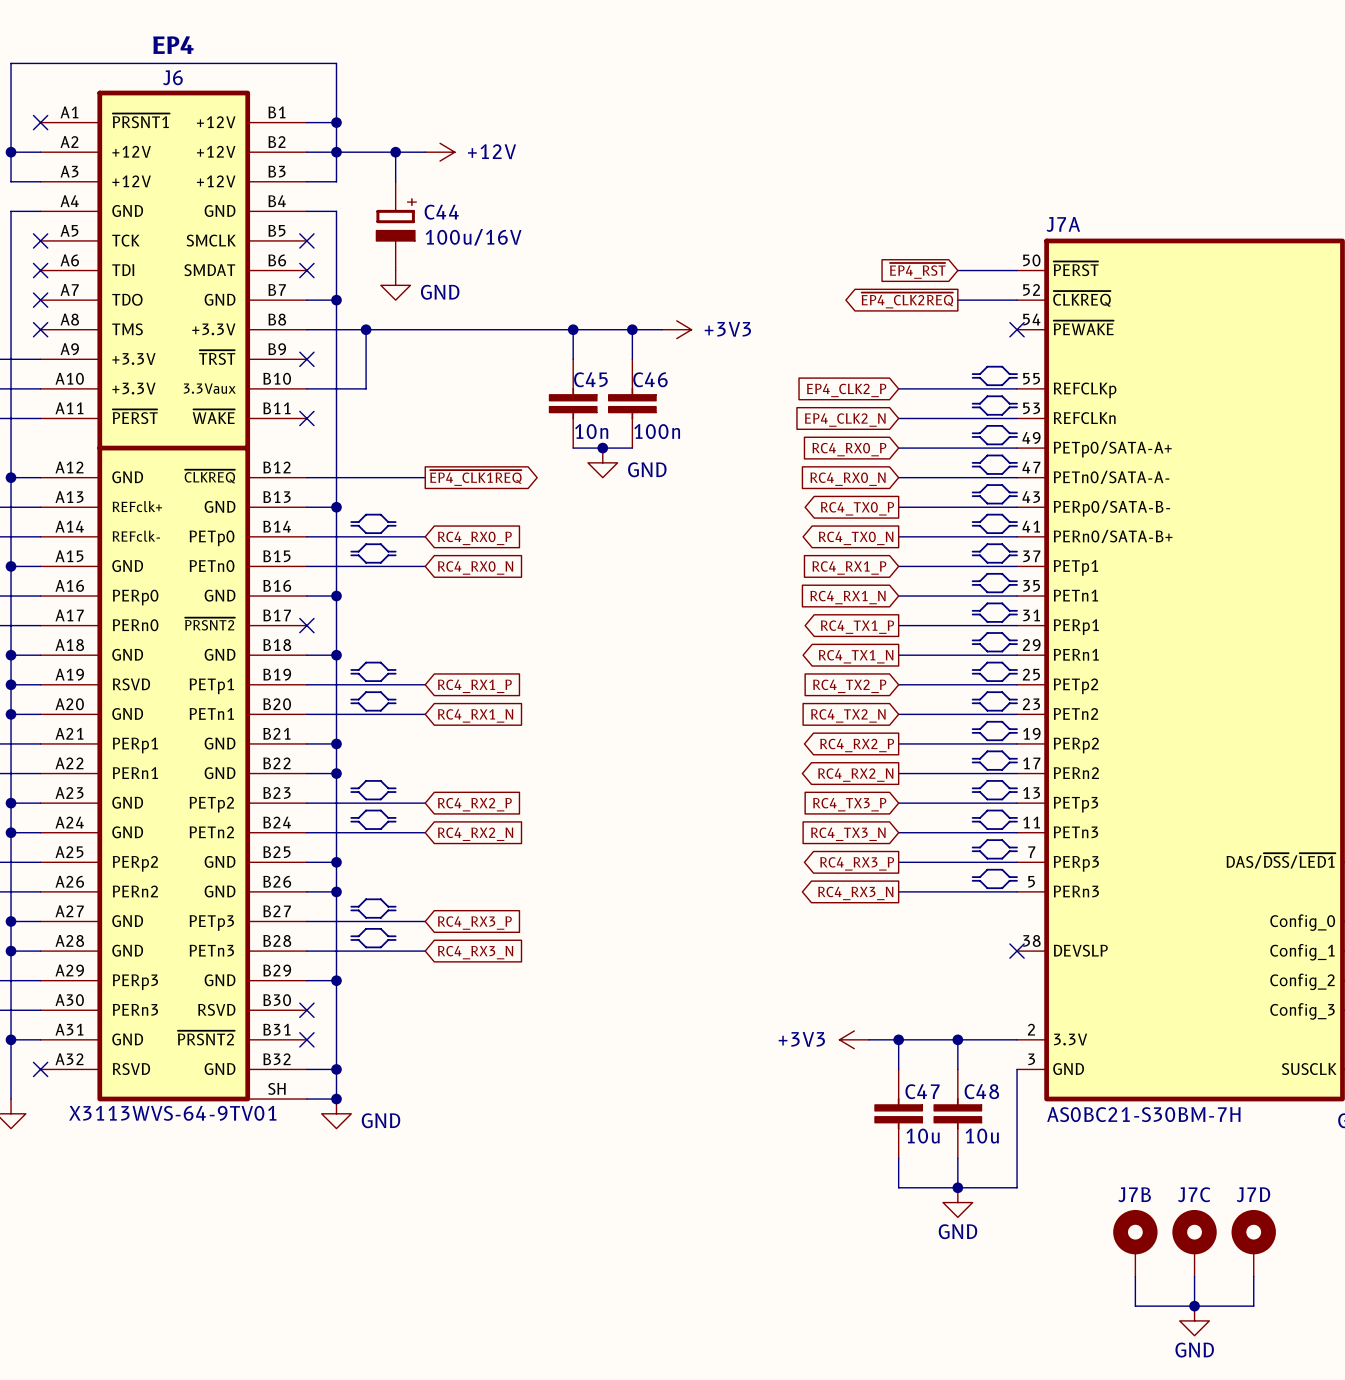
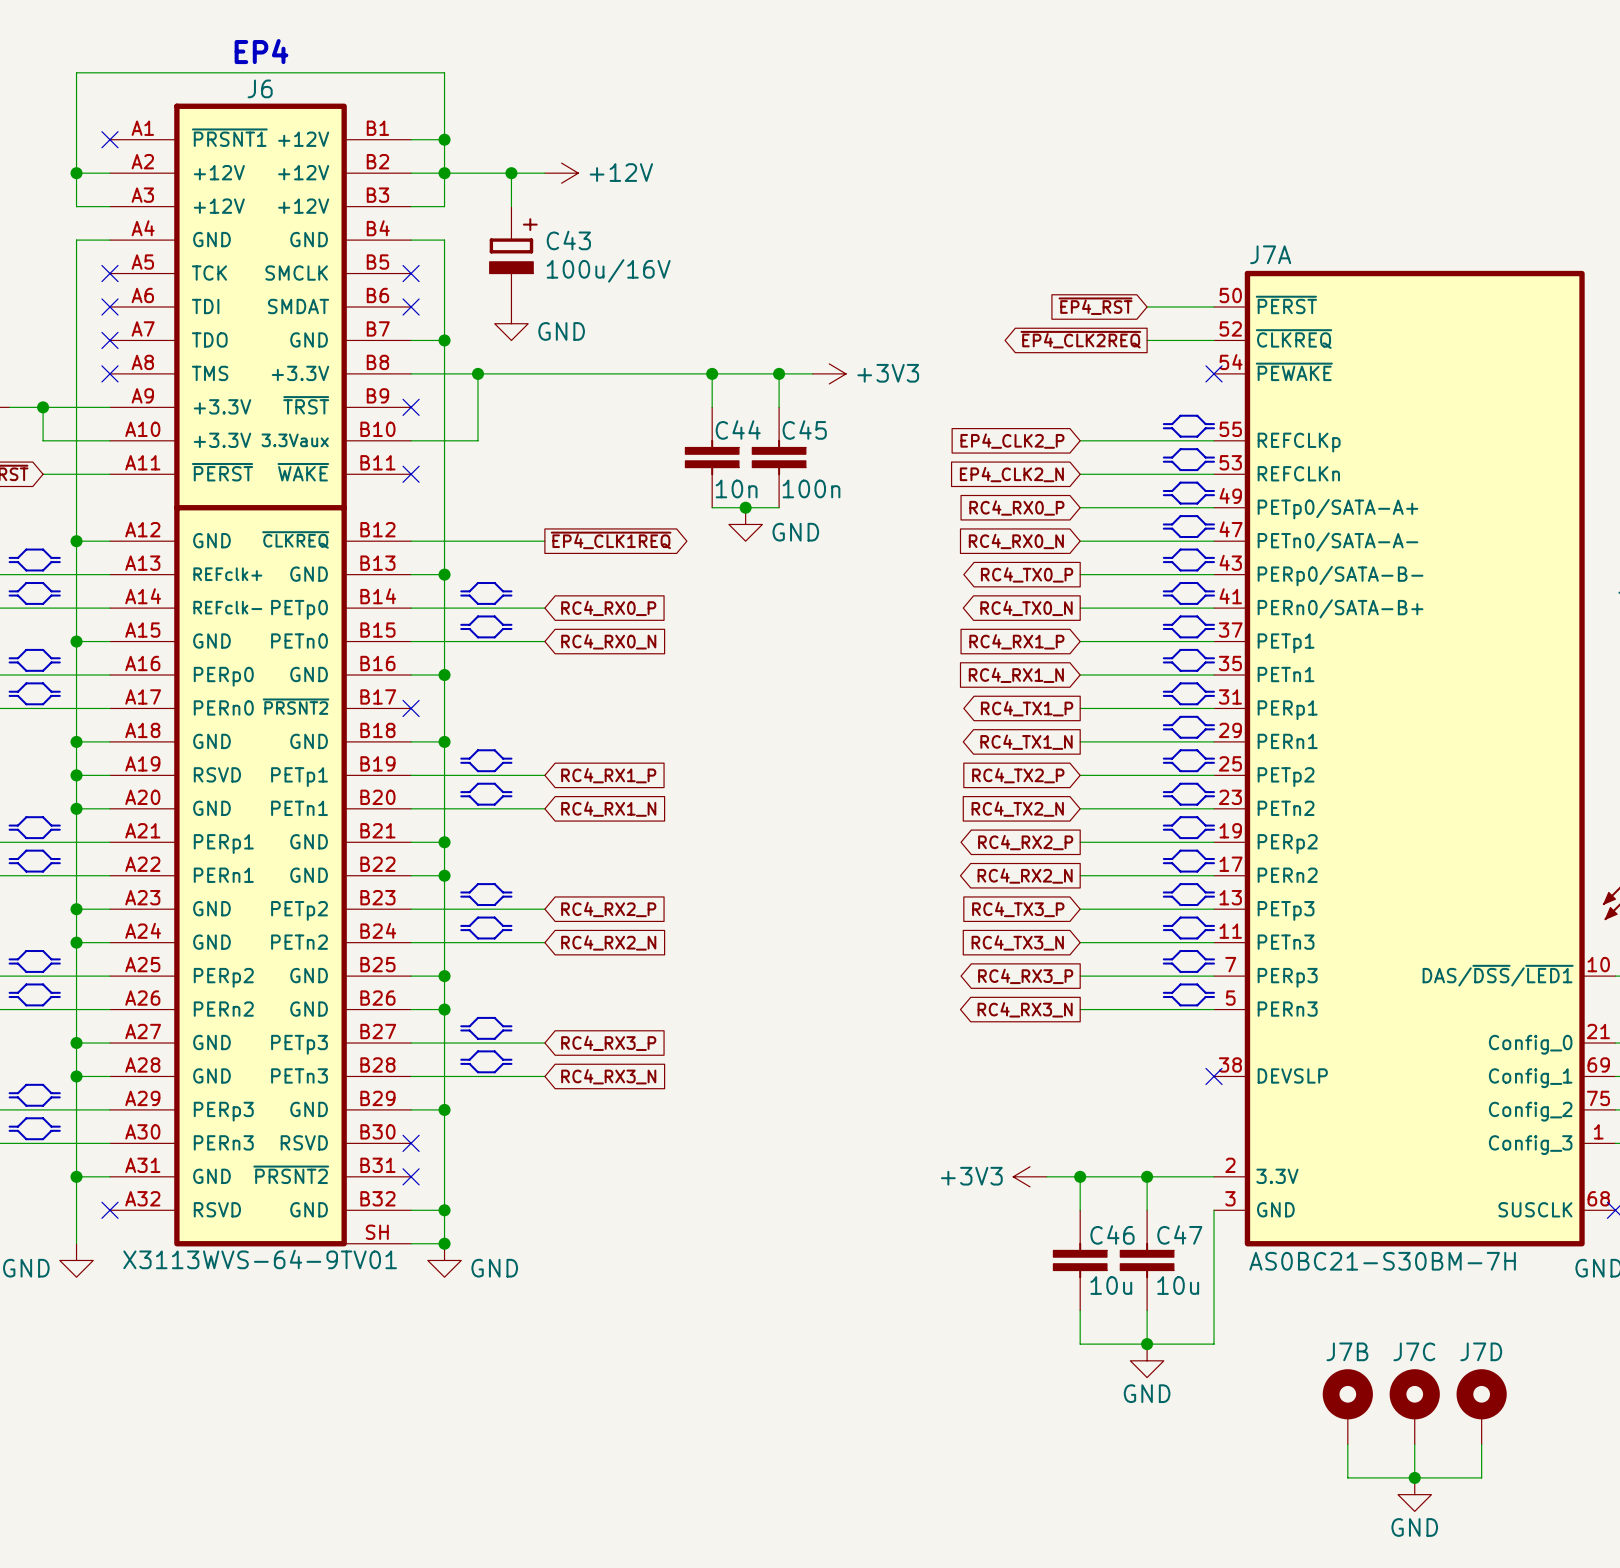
C44 name: C44 (441, 212) -> C43 (568, 240)
C45 name: C45 (590, 379) -> C44 (738, 430)
C46 name: C46 (650, 379) -> C45 (804, 430)
C47 name: C47 (922, 1091) -> C46 (1112, 1234)
C48 name: C48 (981, 1091) -> C47 (1179, 1234)

